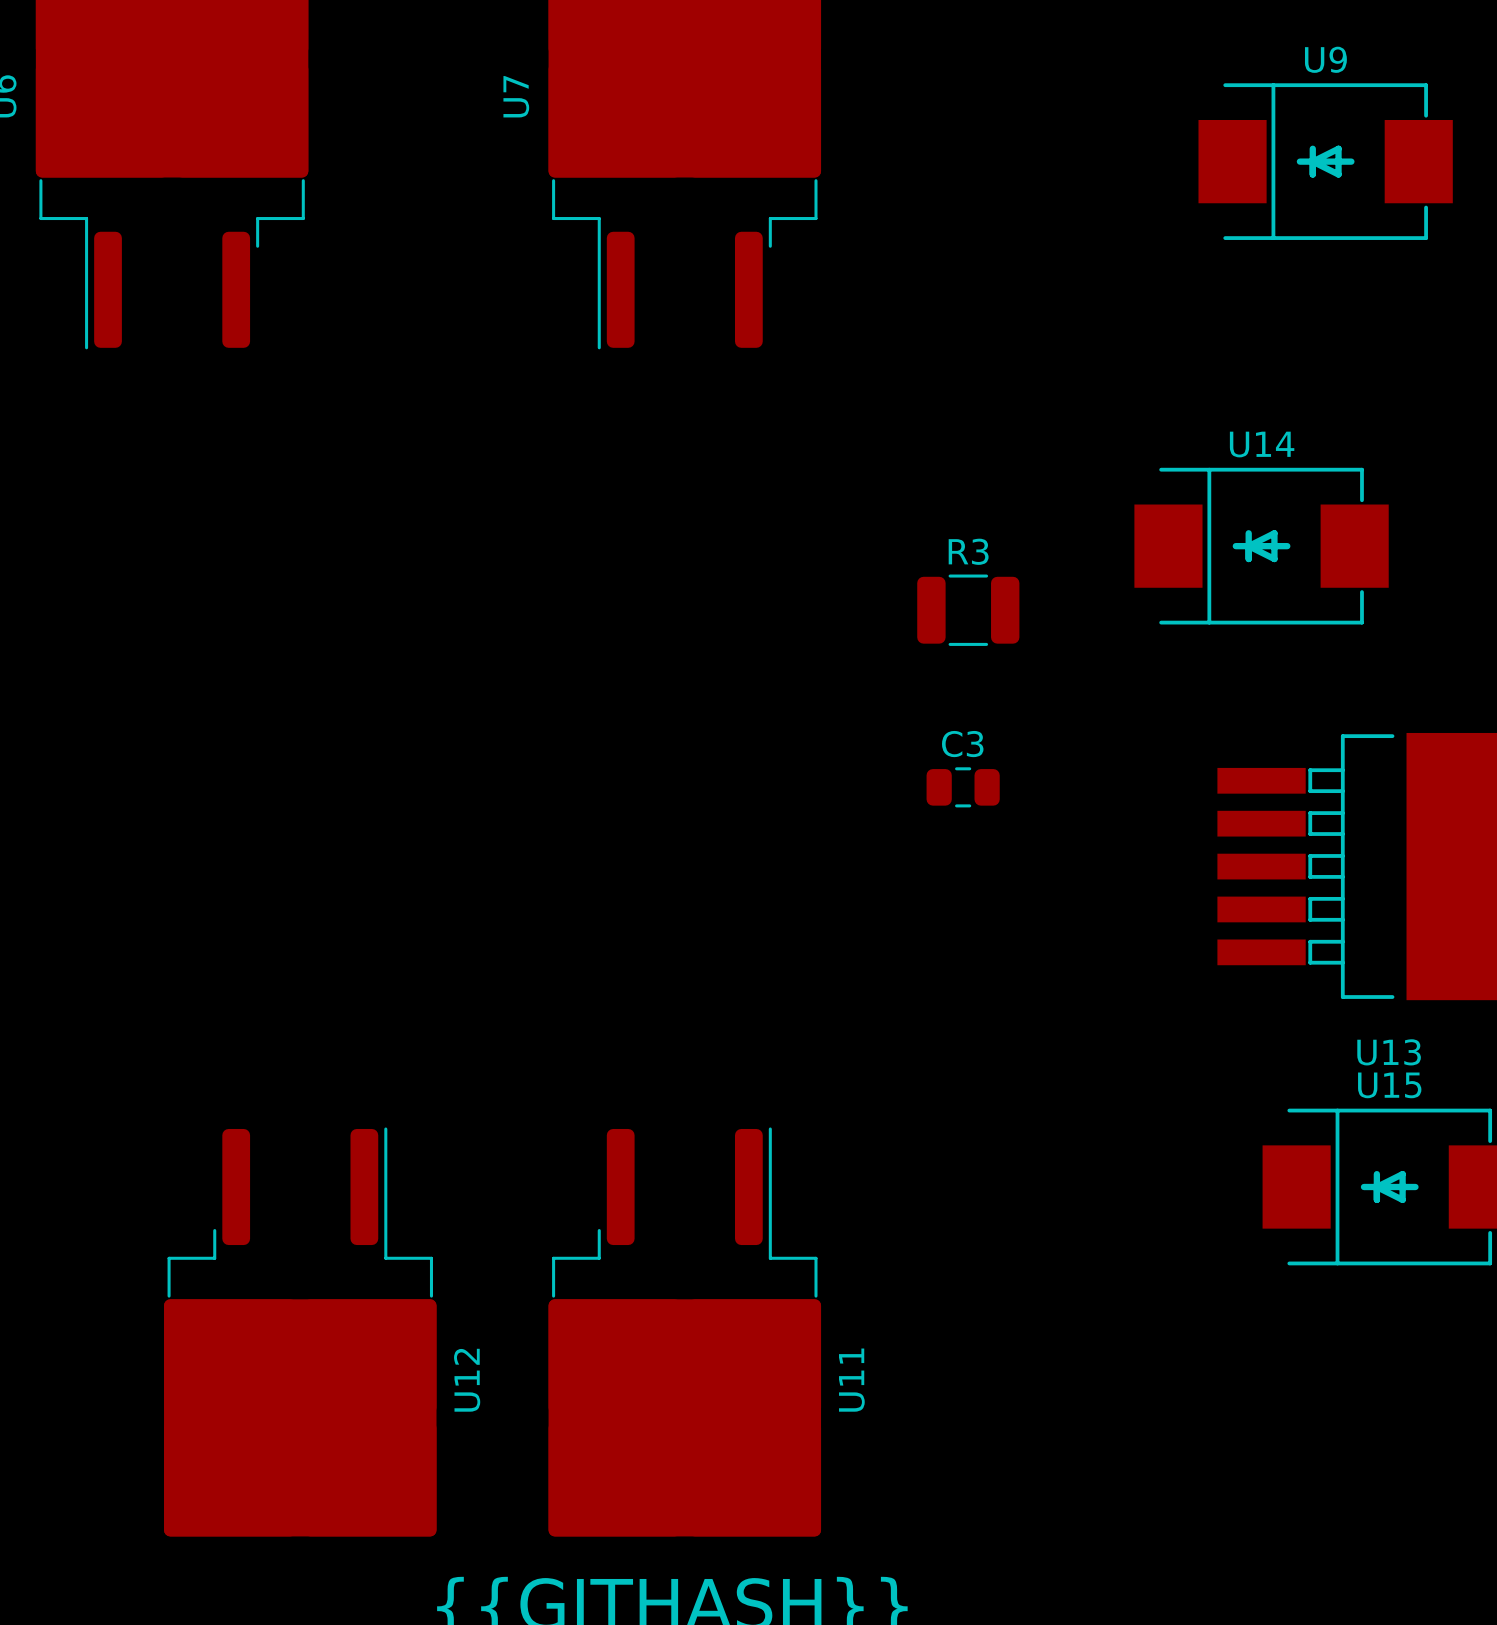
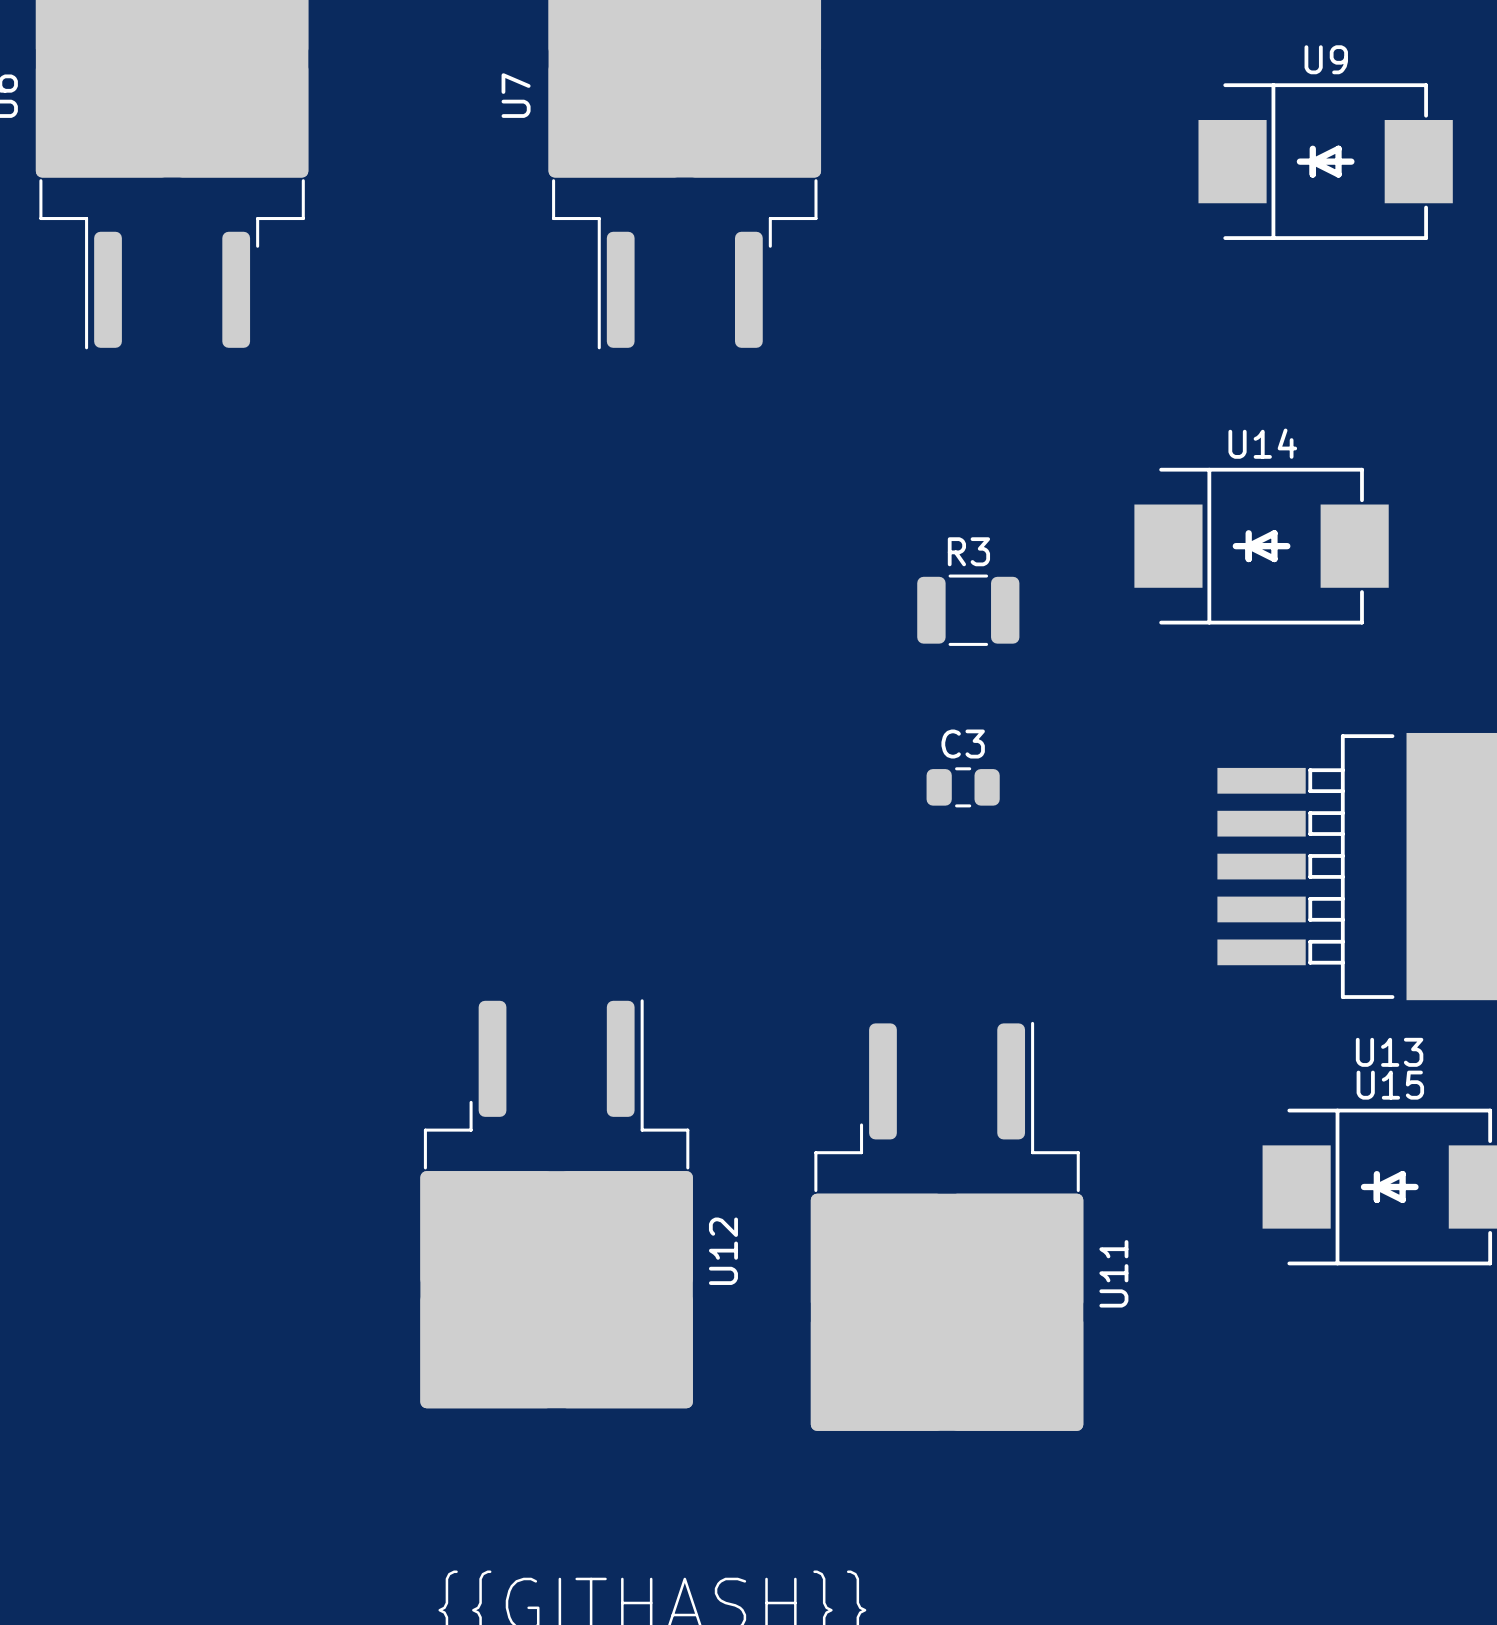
U12 position: (300, 1331) -> (556, 1203)
U11 position: (684, 1331) -> (947, 1226)

